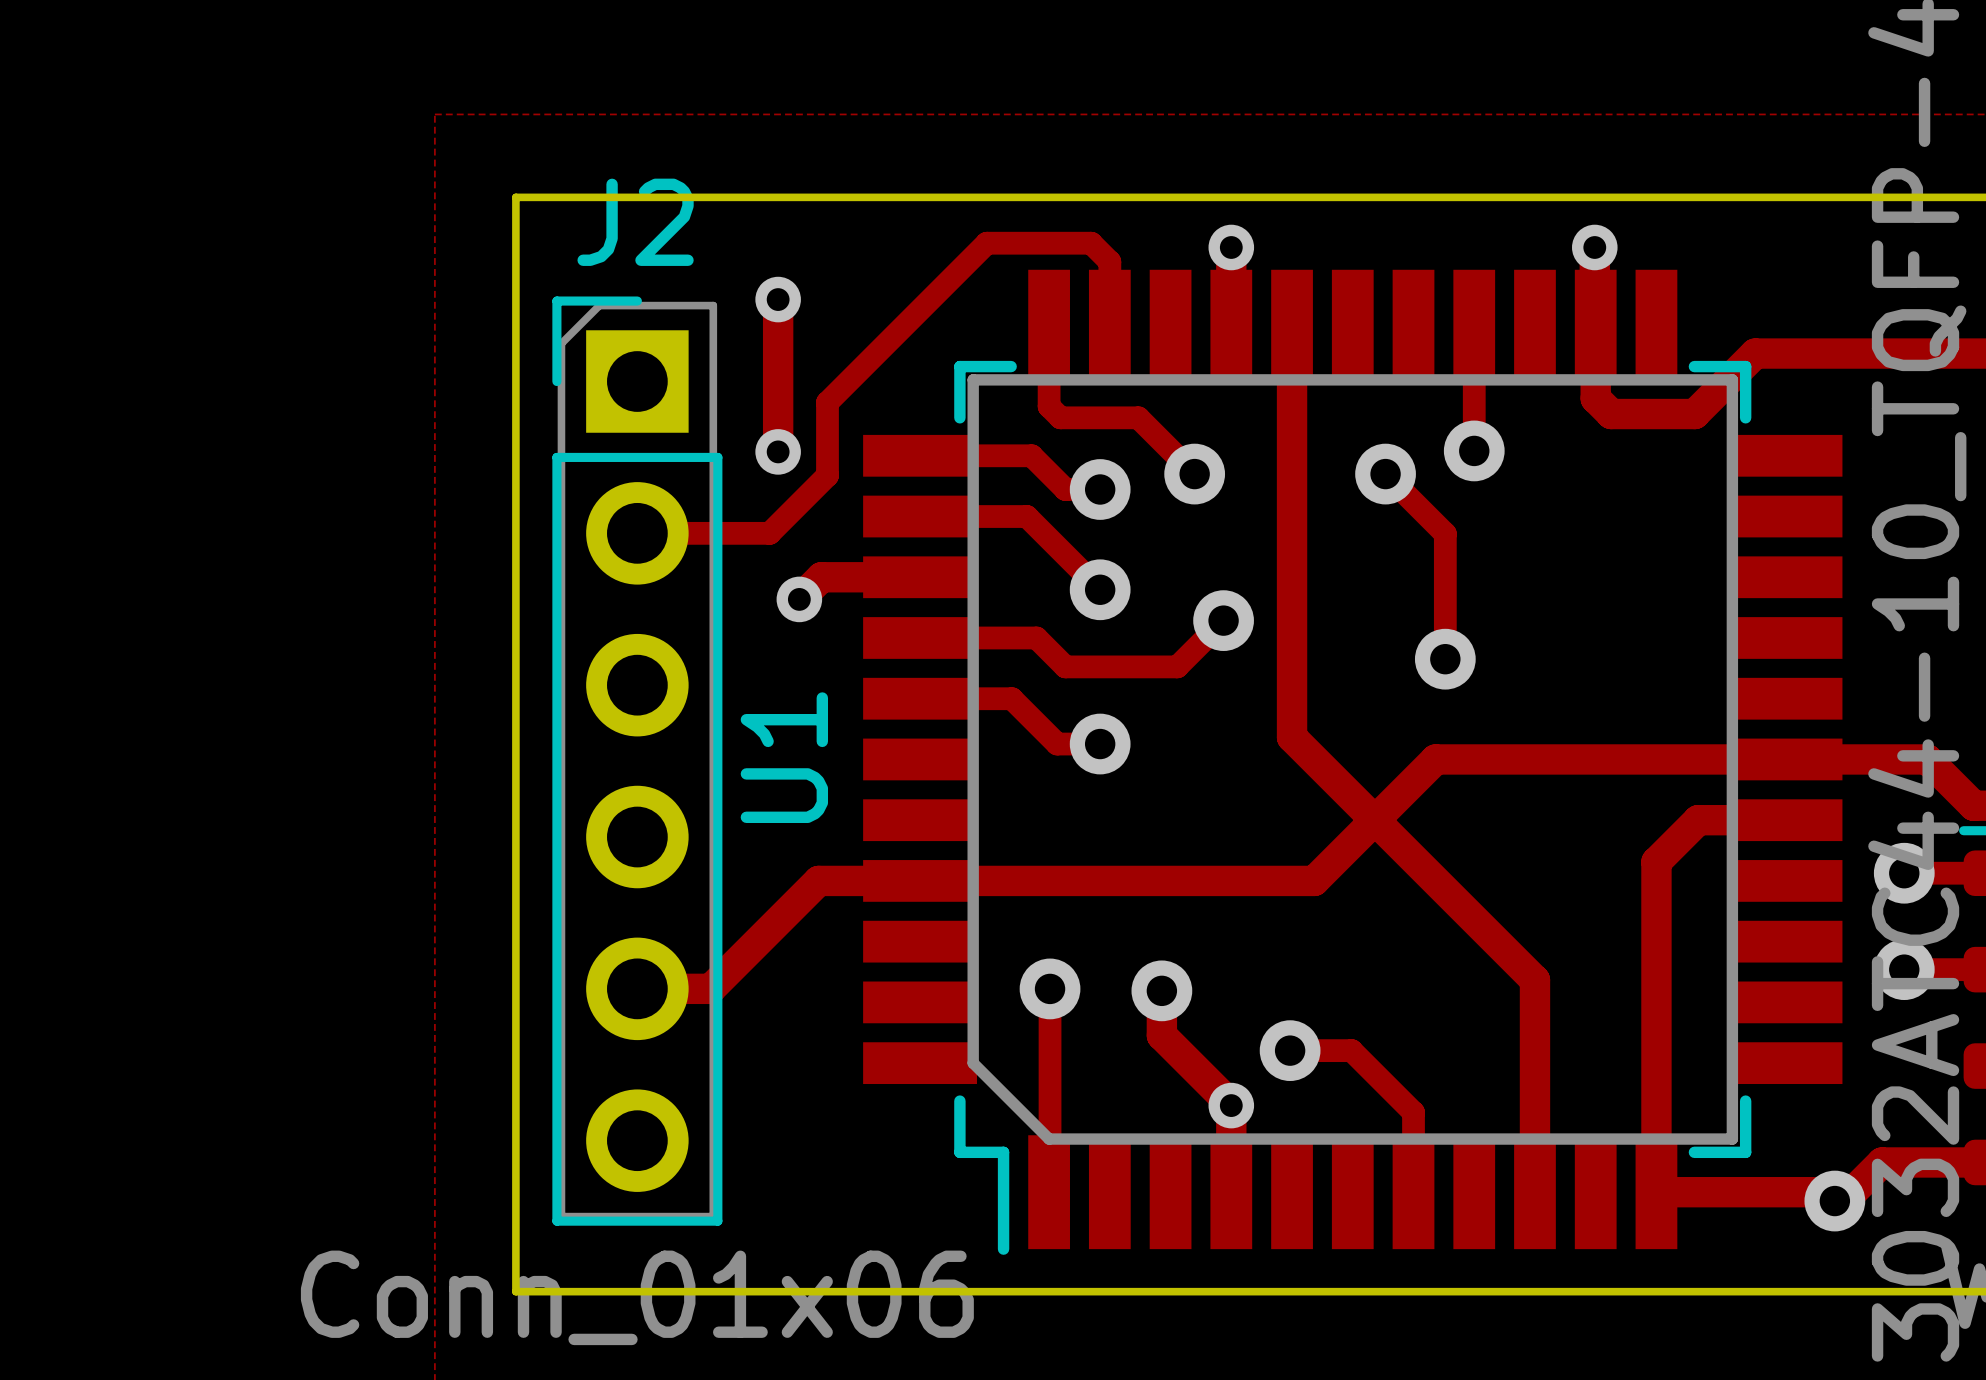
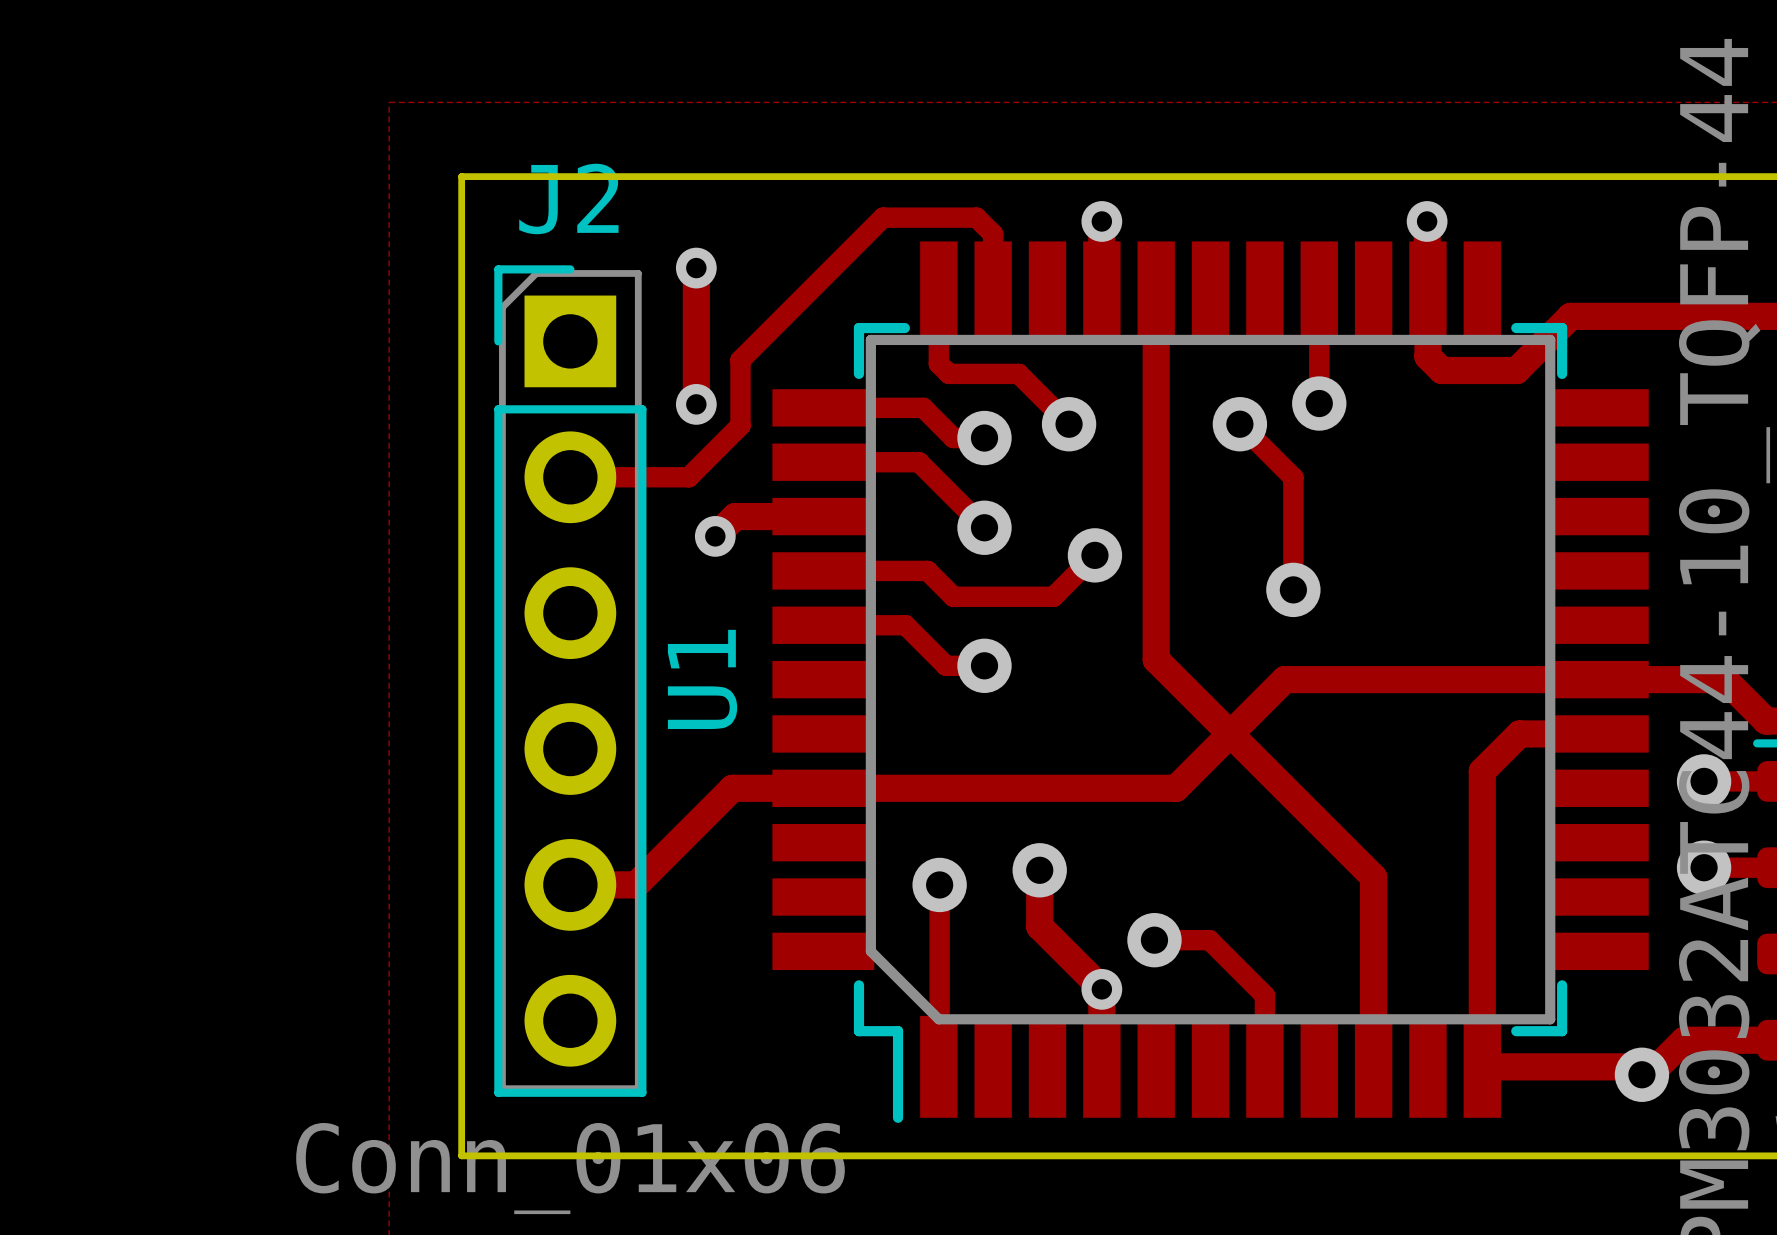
via position: (1161, 990) -> (1039, 870)

